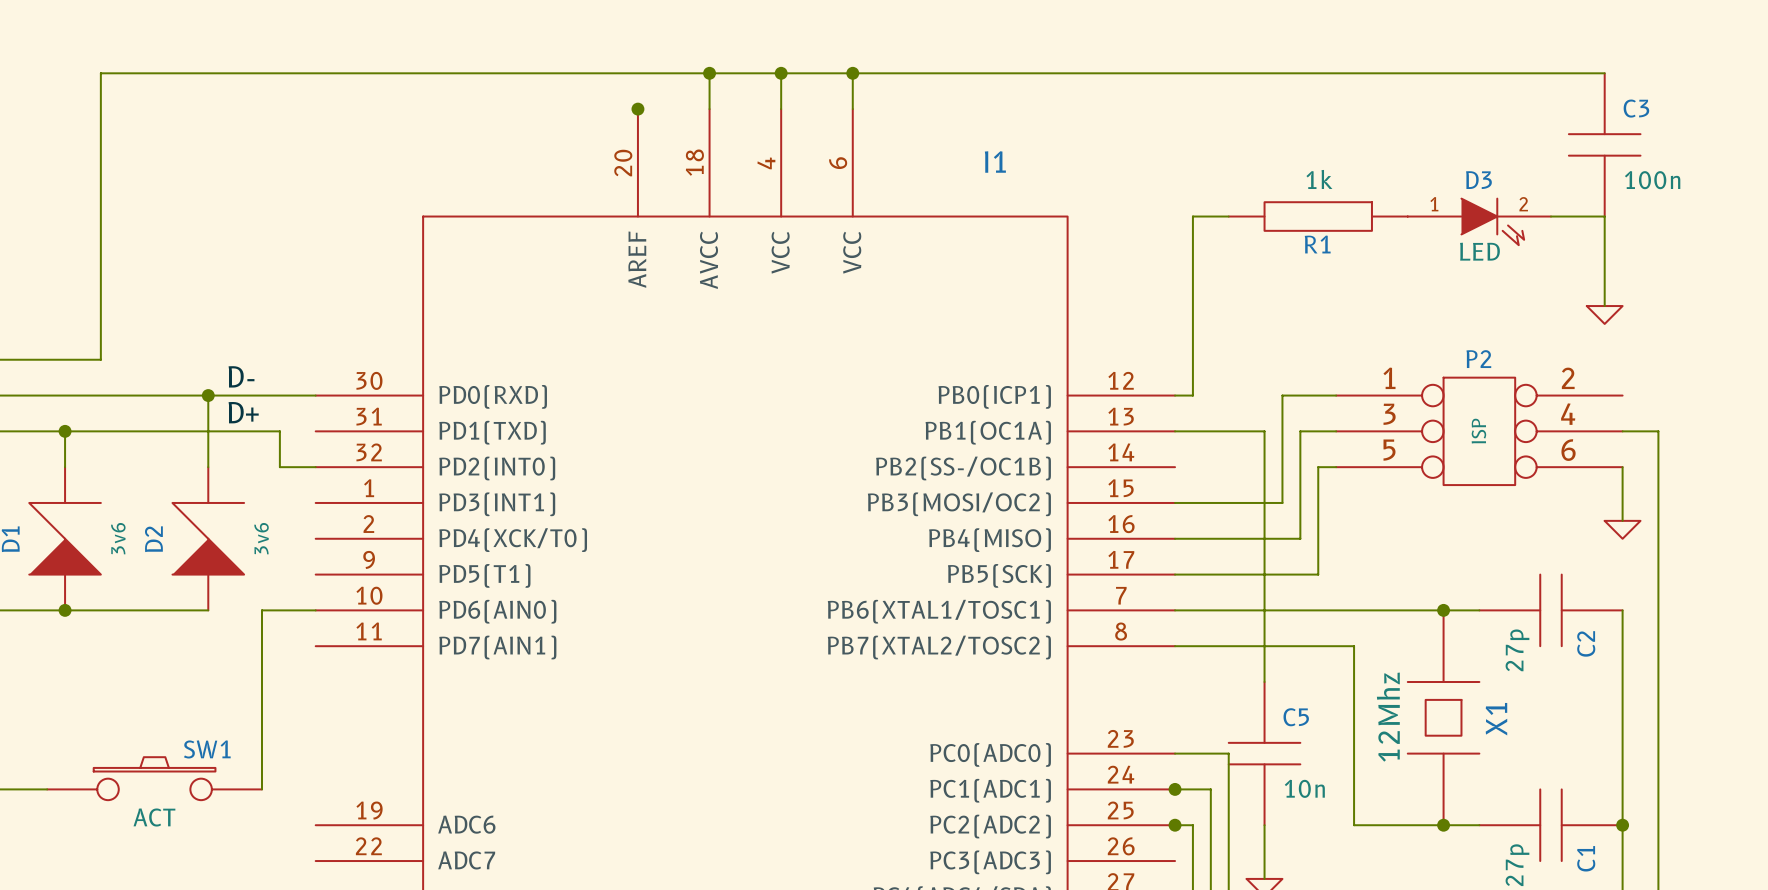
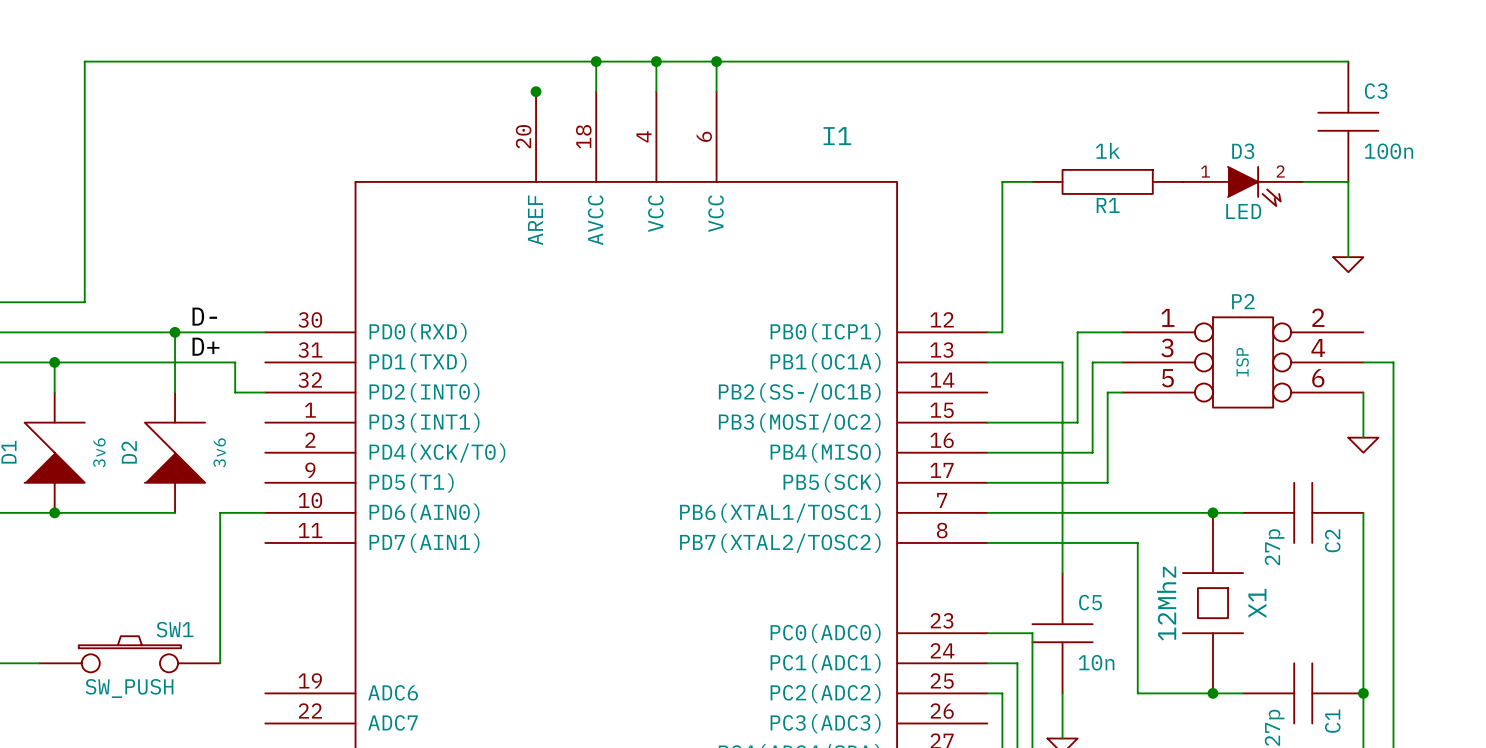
junction: (1175, 789) -> none
SW1 value: ACT (154, 817) -> SW_PUSH (129, 688)
junction: (1175, 825) -> none

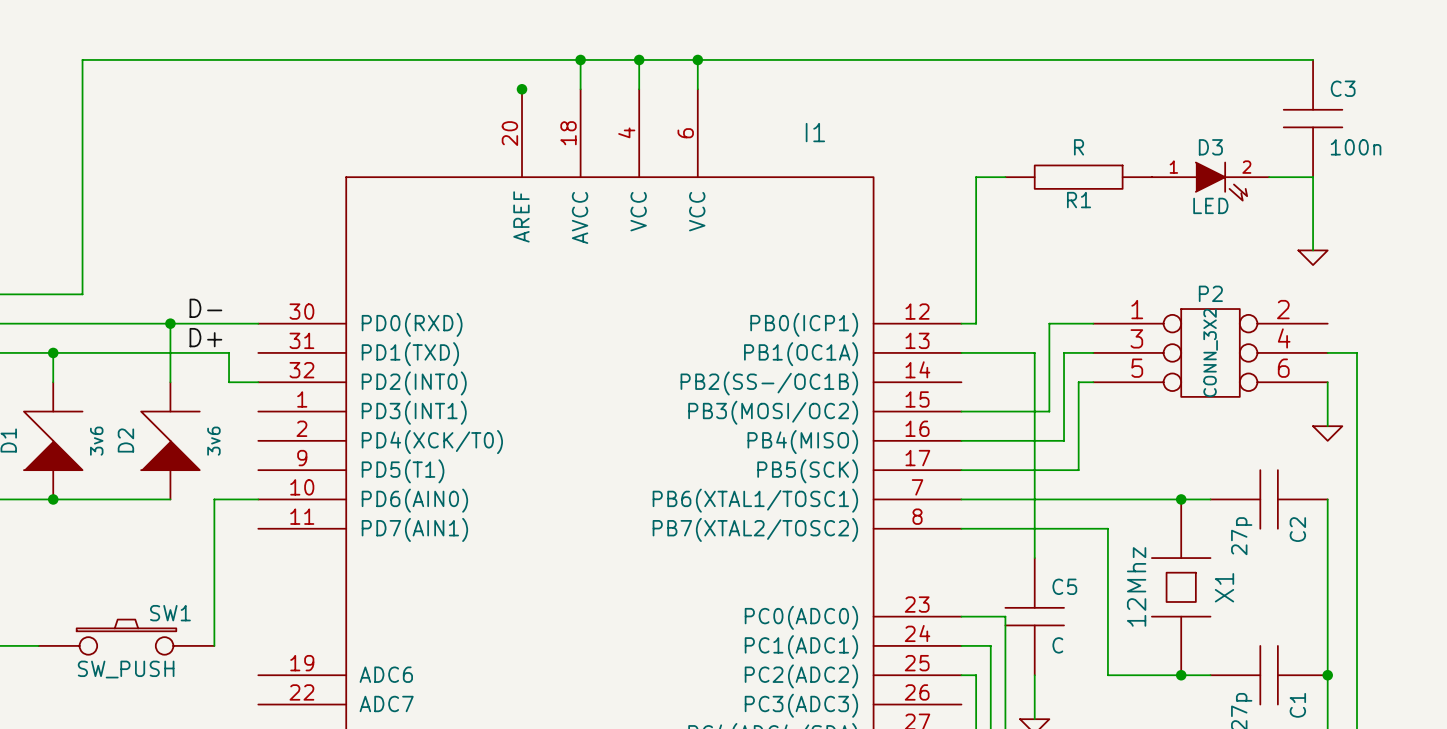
R1 value: 1k (1107, 150) -> R (1079, 147)
P2 value: ISP (1242, 362) -> CONN_3X2 (1210, 352)
C5 value: 10n (1096, 662) -> C (1057, 645)

